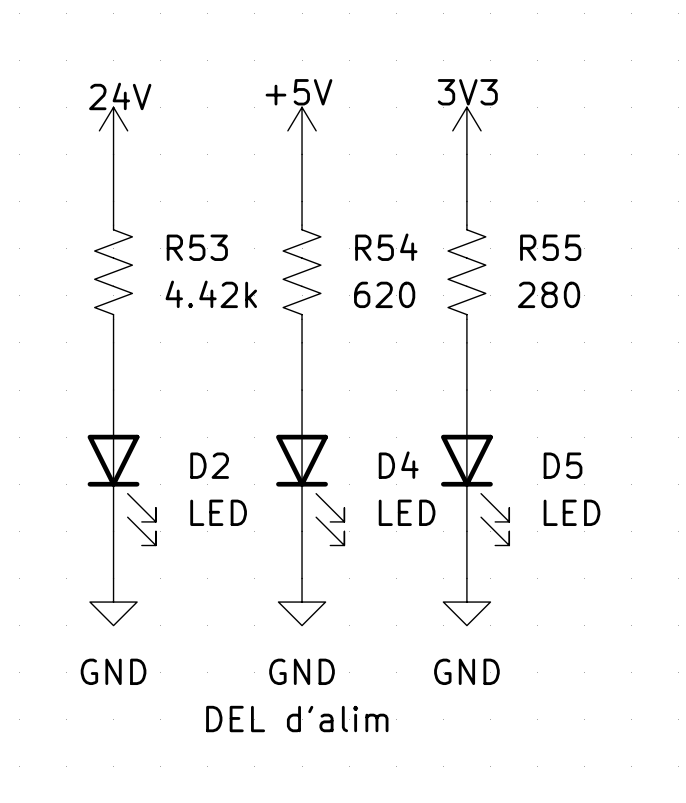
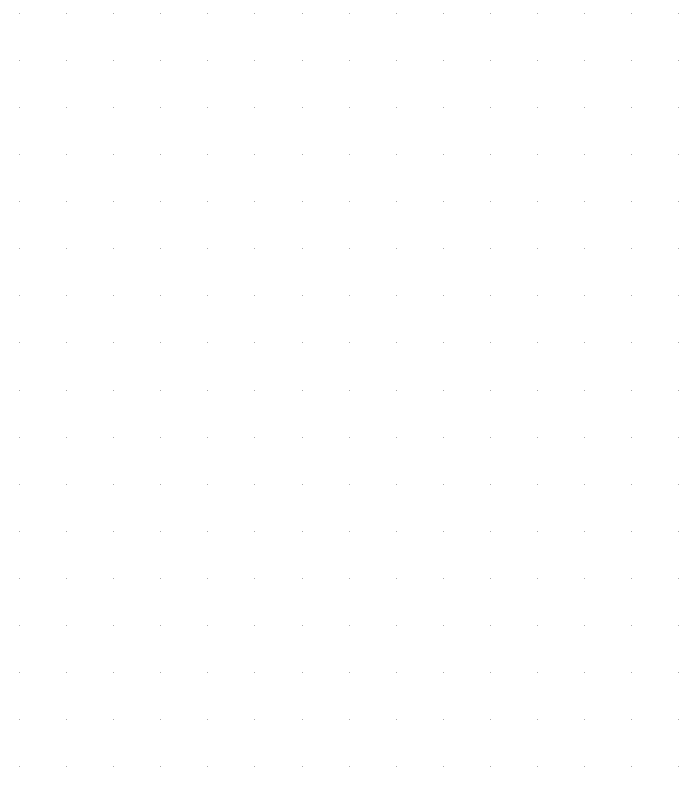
power symbol: 24V (113, 130) -> none
power symbol: +5V (302, 130) -> none
power symbol: 3V3 (466, 130) -> none
wire: (113, 154) (113, 201) -> none
wire: (302, 154) (302, 201) -> none
wire: (466, 154) (466, 201) -> none
R53: 4.42k (113, 272) -> none
R54: 620 (302, 272) -> none
R55: 280 (466, 272) -> none
wire: (113, 342) (113, 390) -> none
wire: (302, 342) (302, 390) -> none
wire: (466, 342) (466, 390) -> none
D2: LED (121, 467) -> none
D4: LED (310, 467) -> none
D5: LED (475, 467) -> none
wire: (113, 531) (113, 578) -> none
wire: (302, 531) (302, 578) -> none
wire: (466, 531) (466, 578) -> none
power symbol: GND (113, 602) -> none
power symbol: GND (302, 602) -> none
power symbol: GND (466, 602) -> none
text: DEL d'alim (297, 719) -> none

